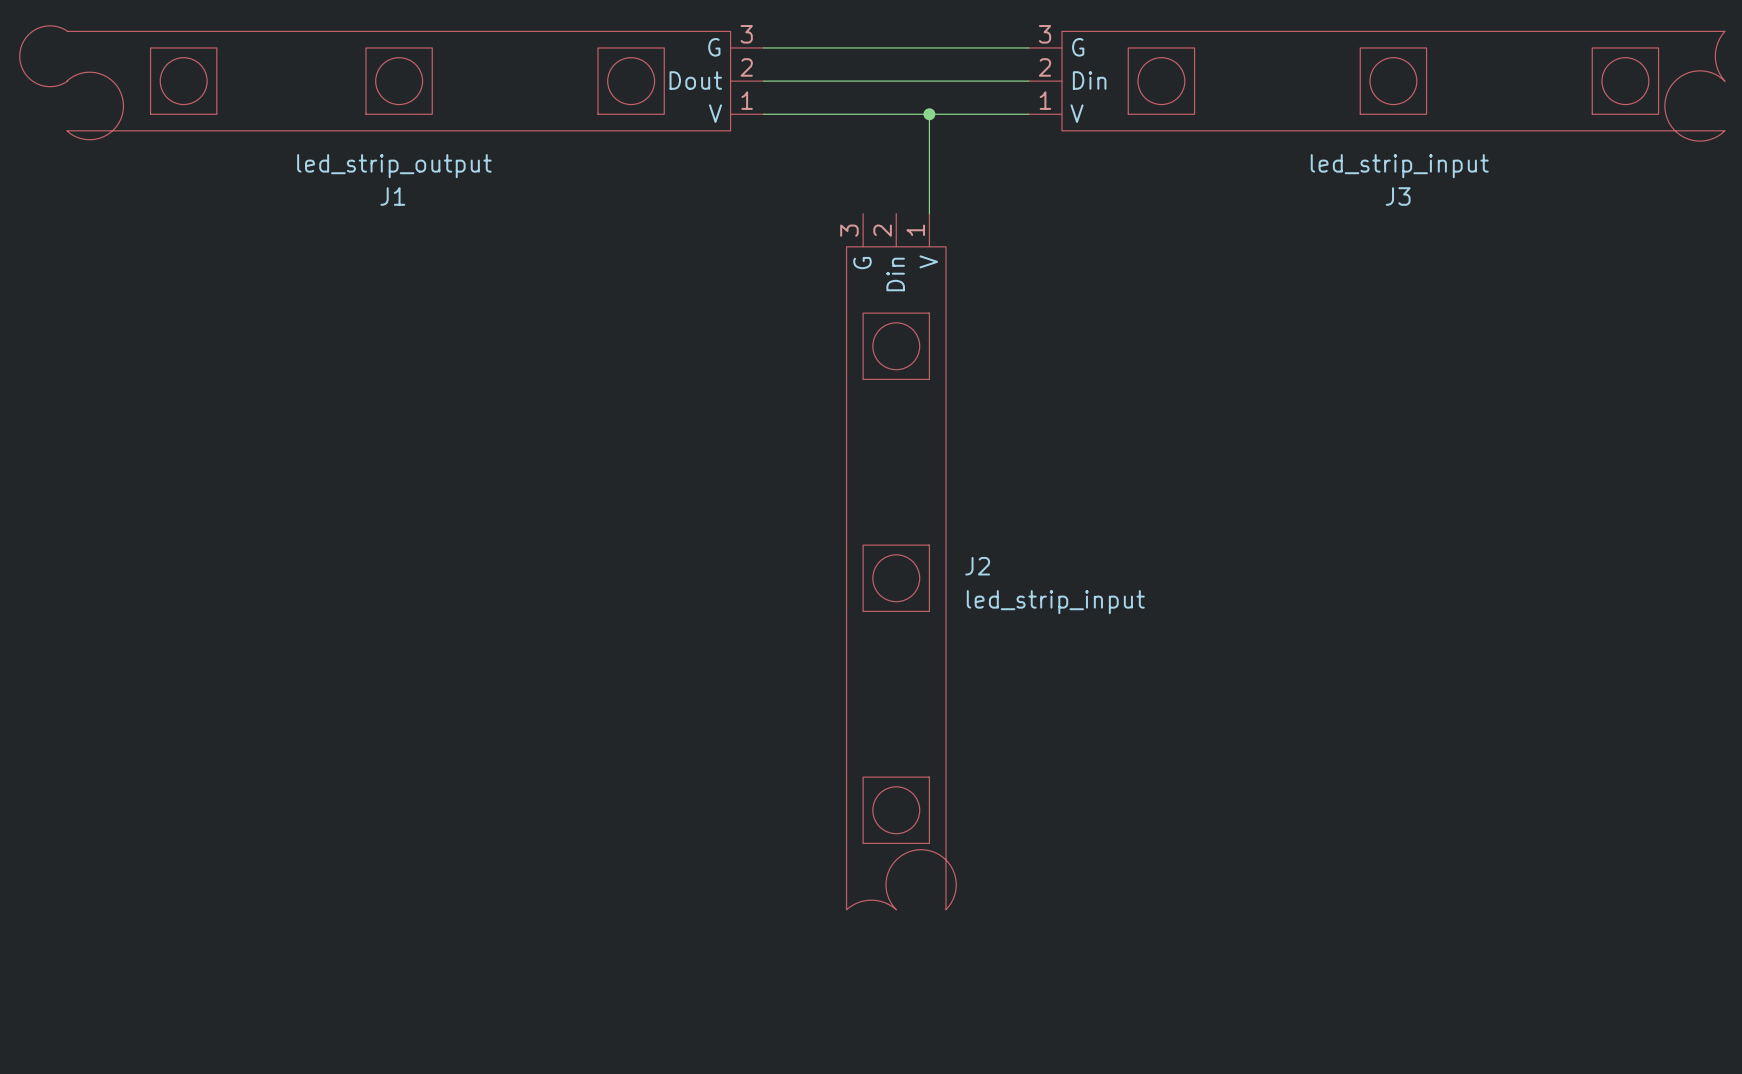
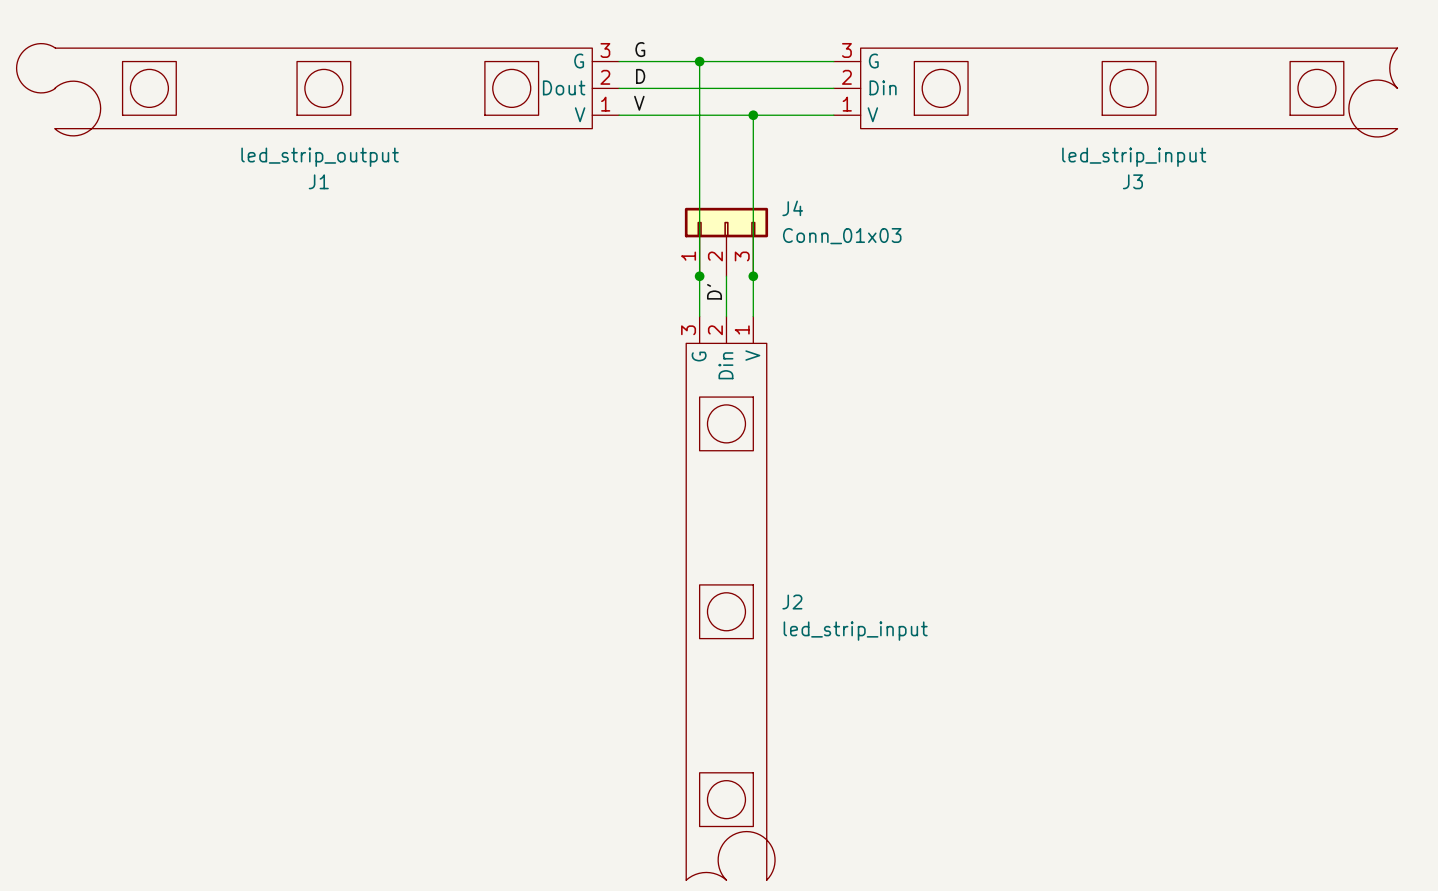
label: none -> G (640, 49)
wire: none -> (699, 61) (699, 316)
junction: none -> (699, 61)
label: none -> D (640, 76)
label: none -> V (639, 103)
J4: none -> Conn_01x03 (726, 242)
junction: none -> (699, 276)
wire: none -> (726, 276) (726, 316)
junction: none -> (753, 276)
label: none -> D' (714, 291)
J2 position: (901, 561) -> (730, 598)

